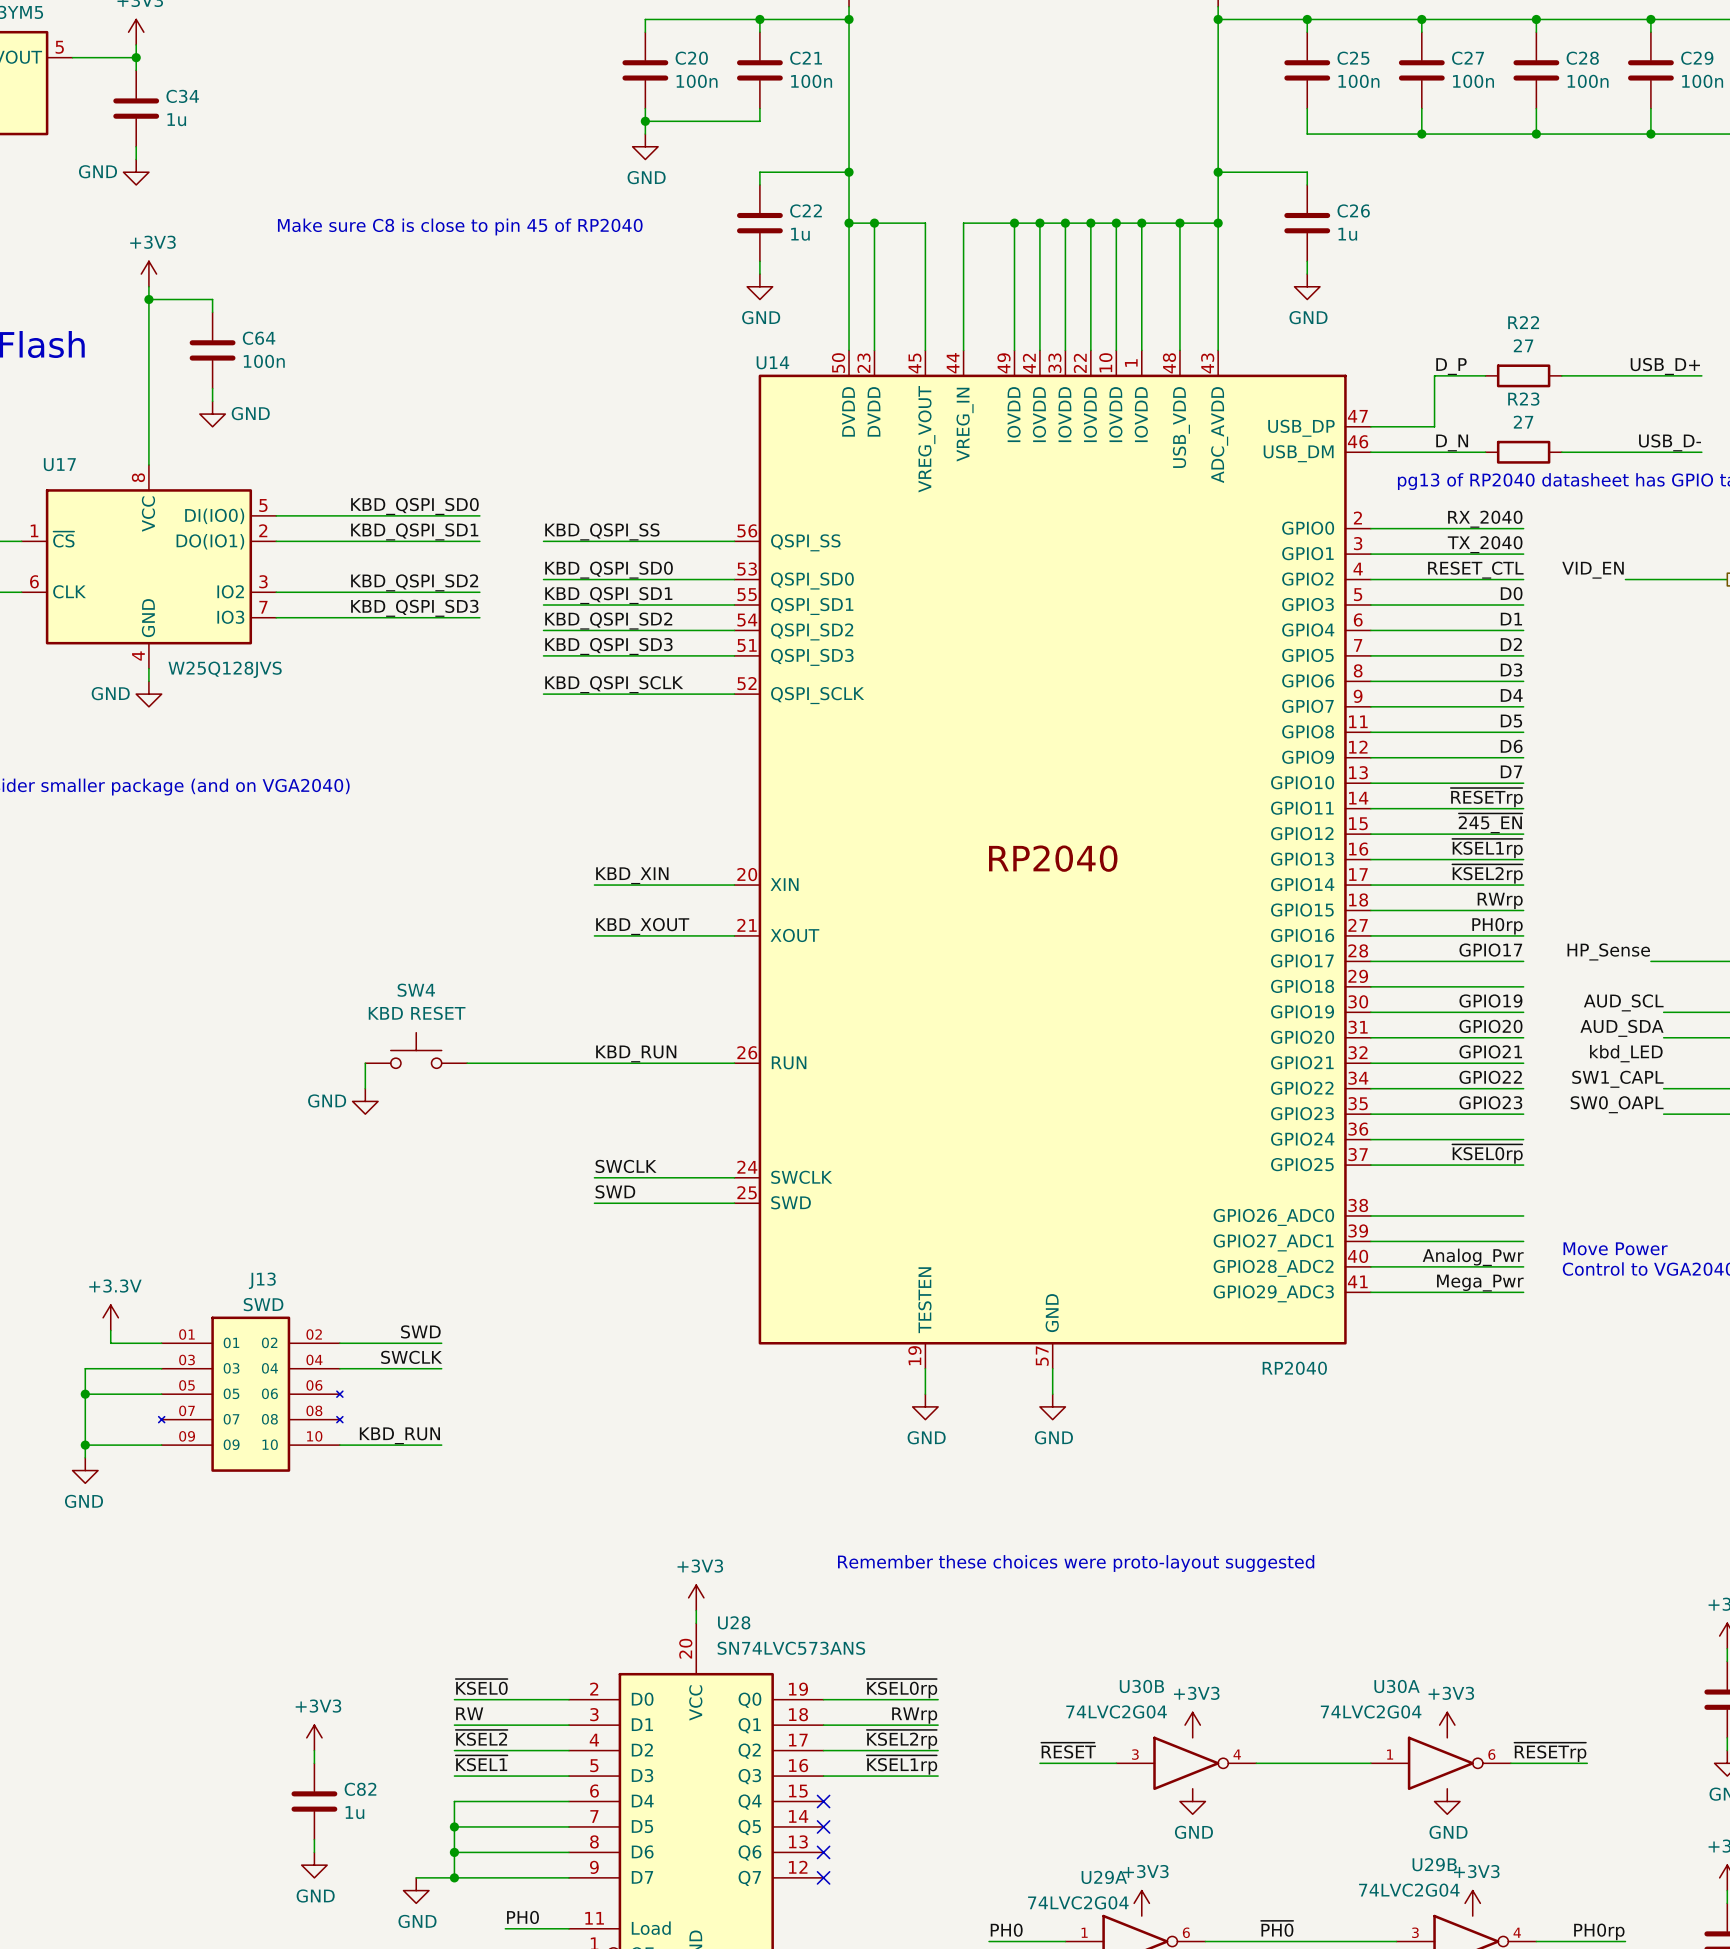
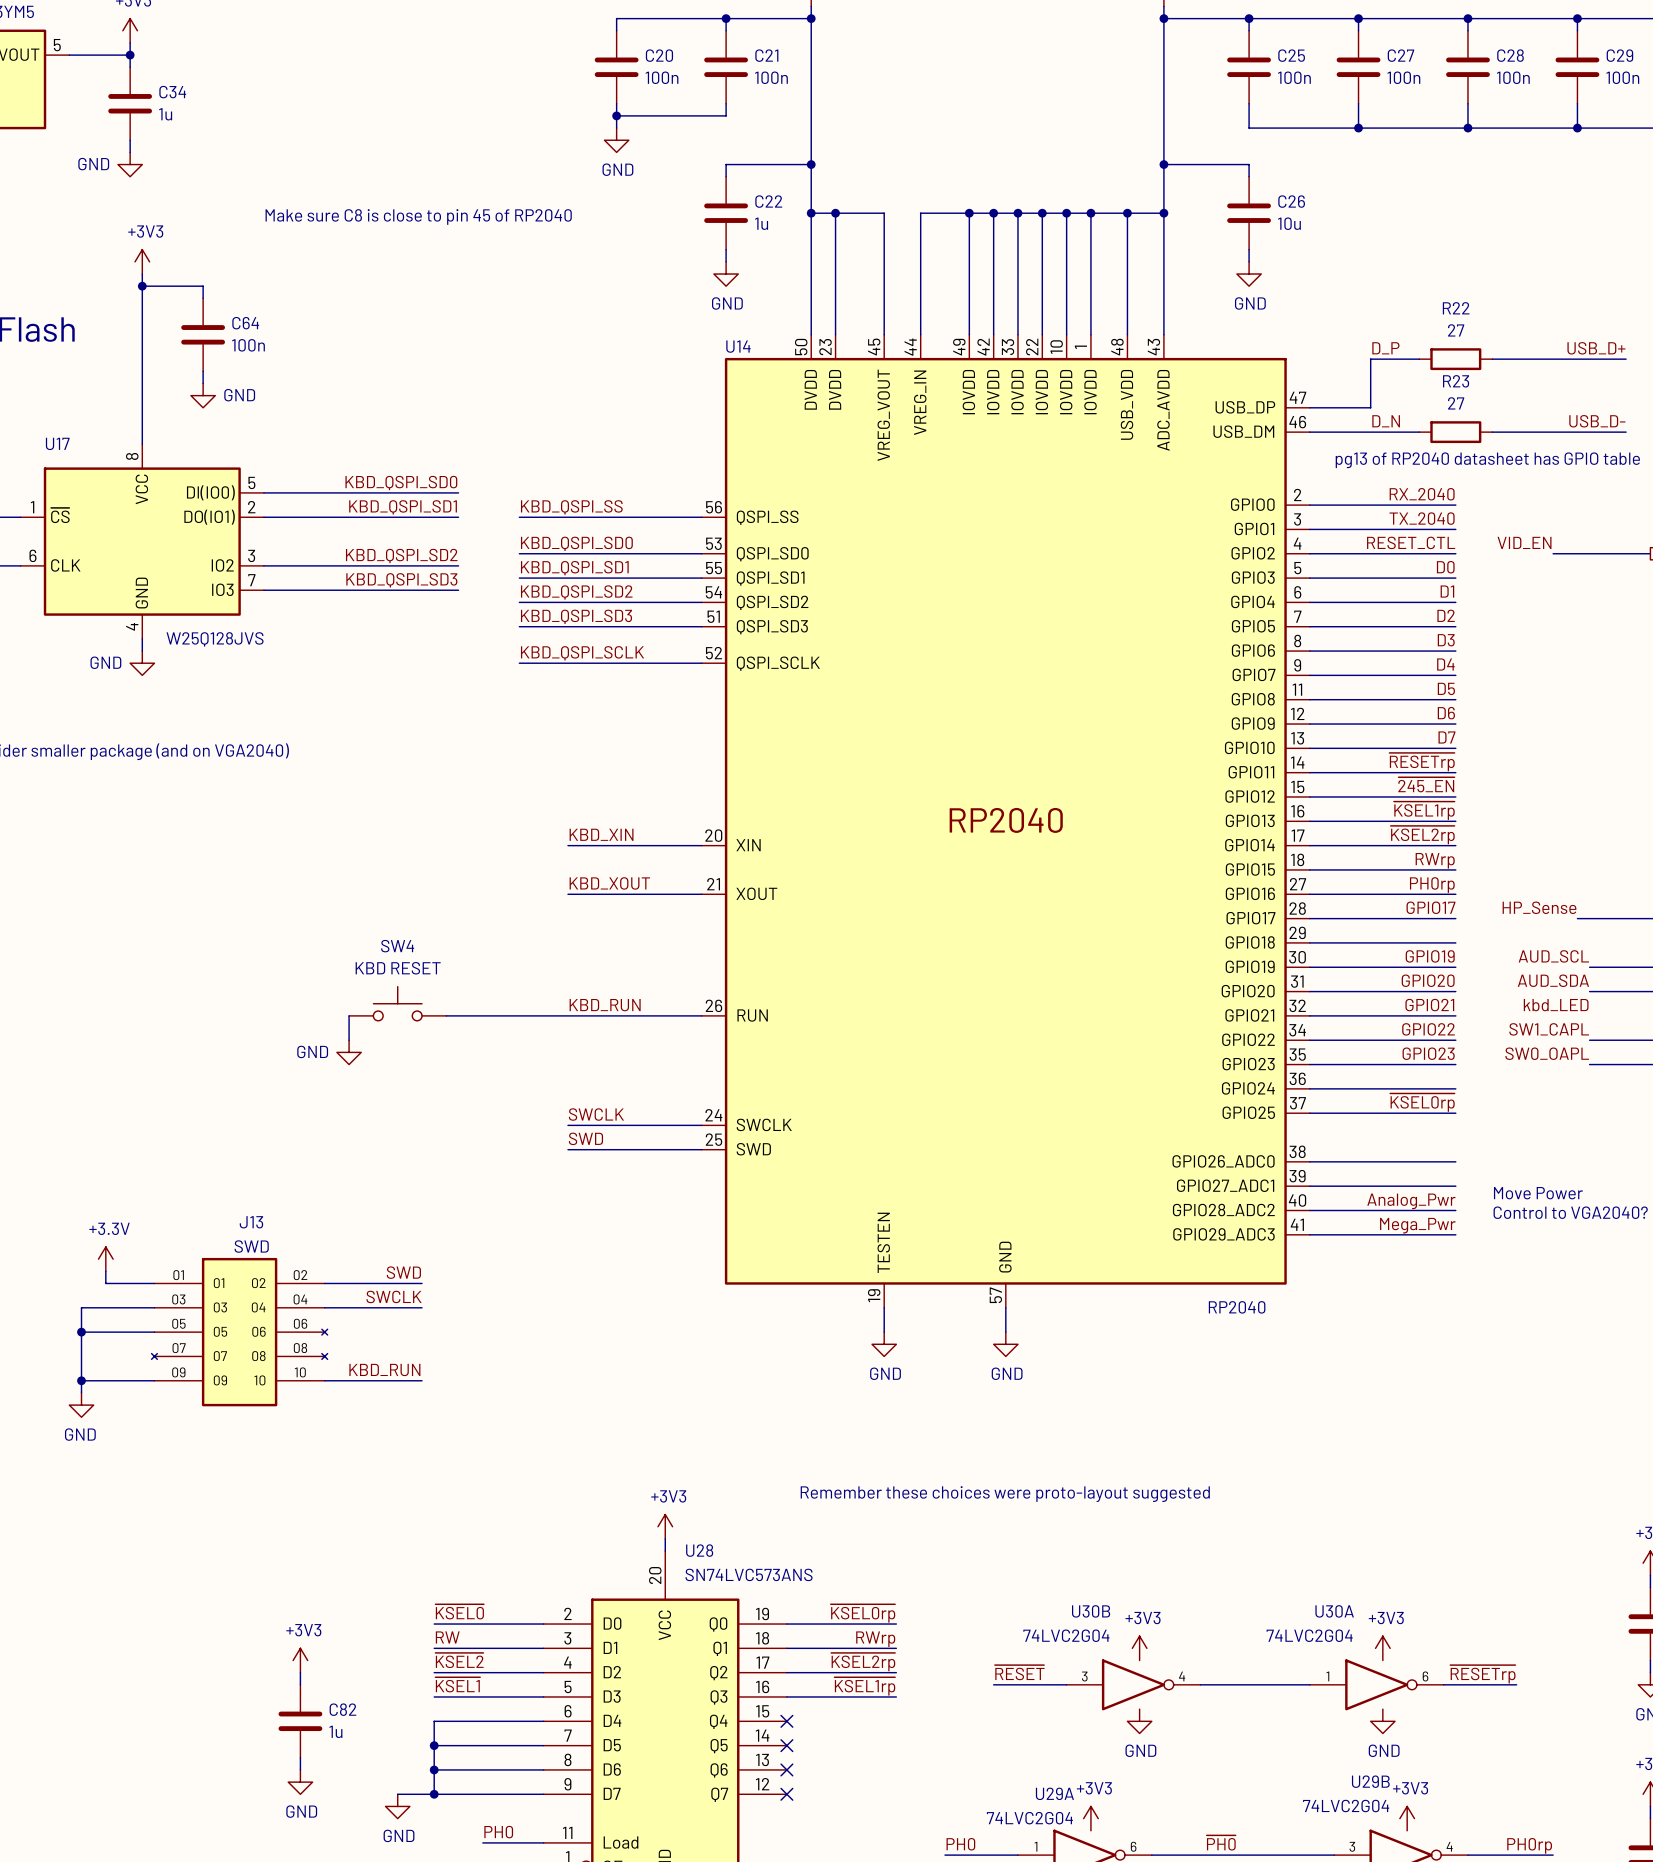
C26 value: 1u (1347, 234) -> 10u (1289, 223)

